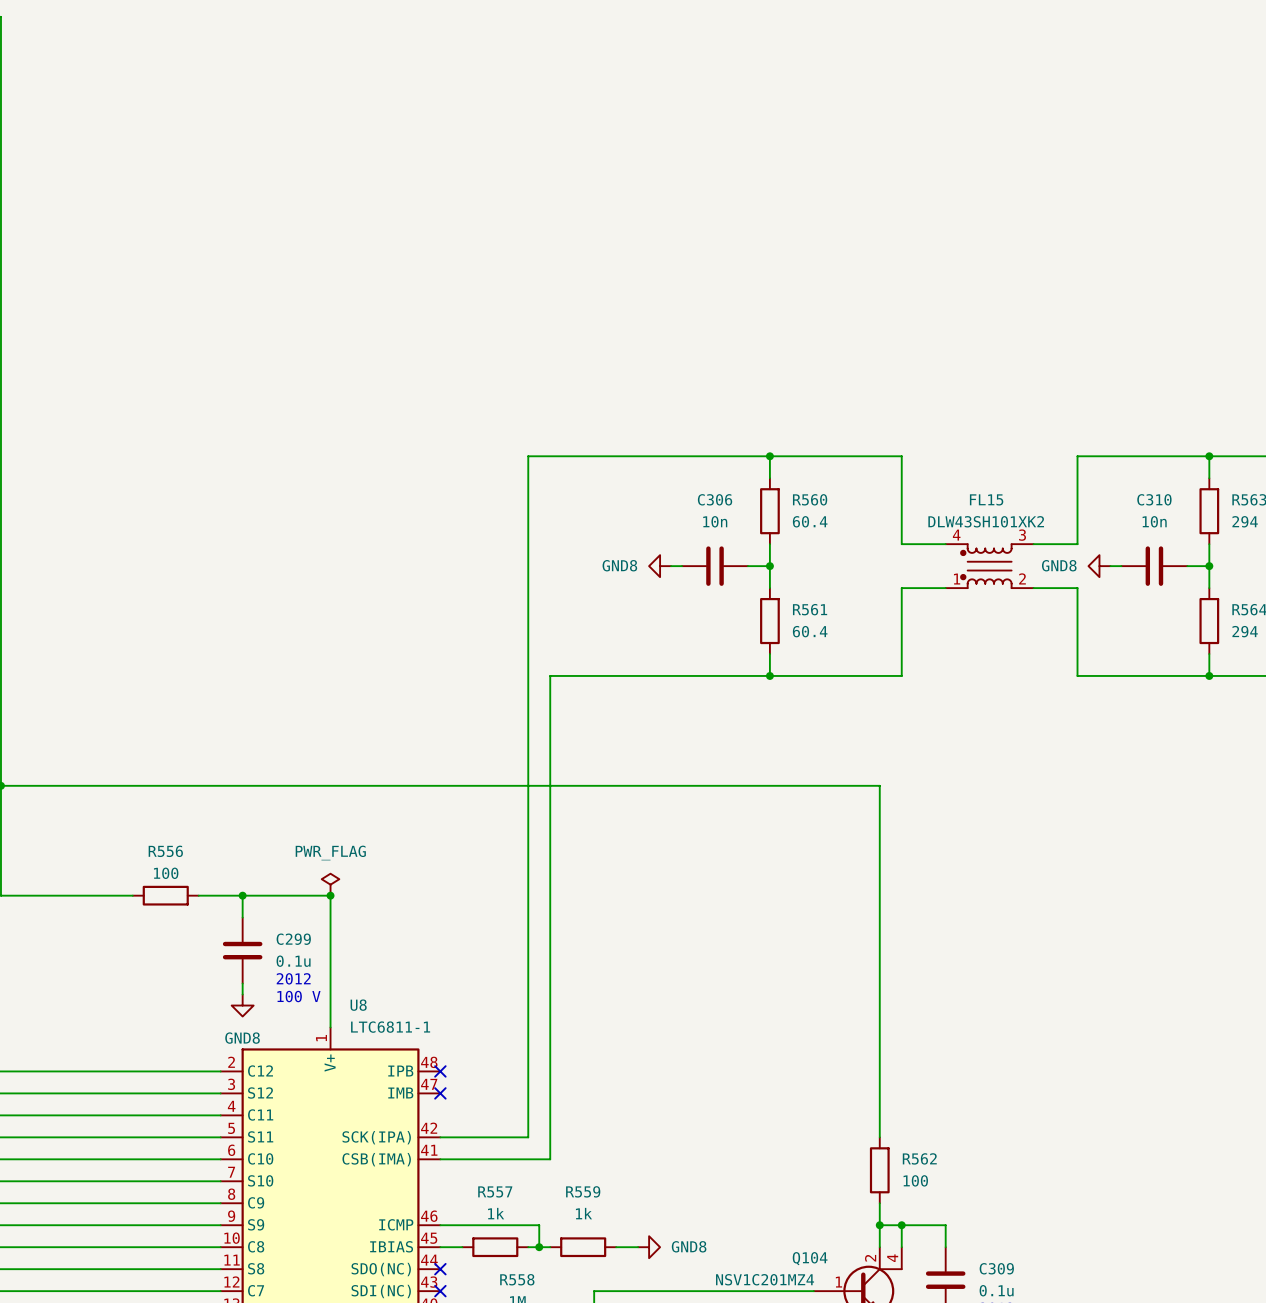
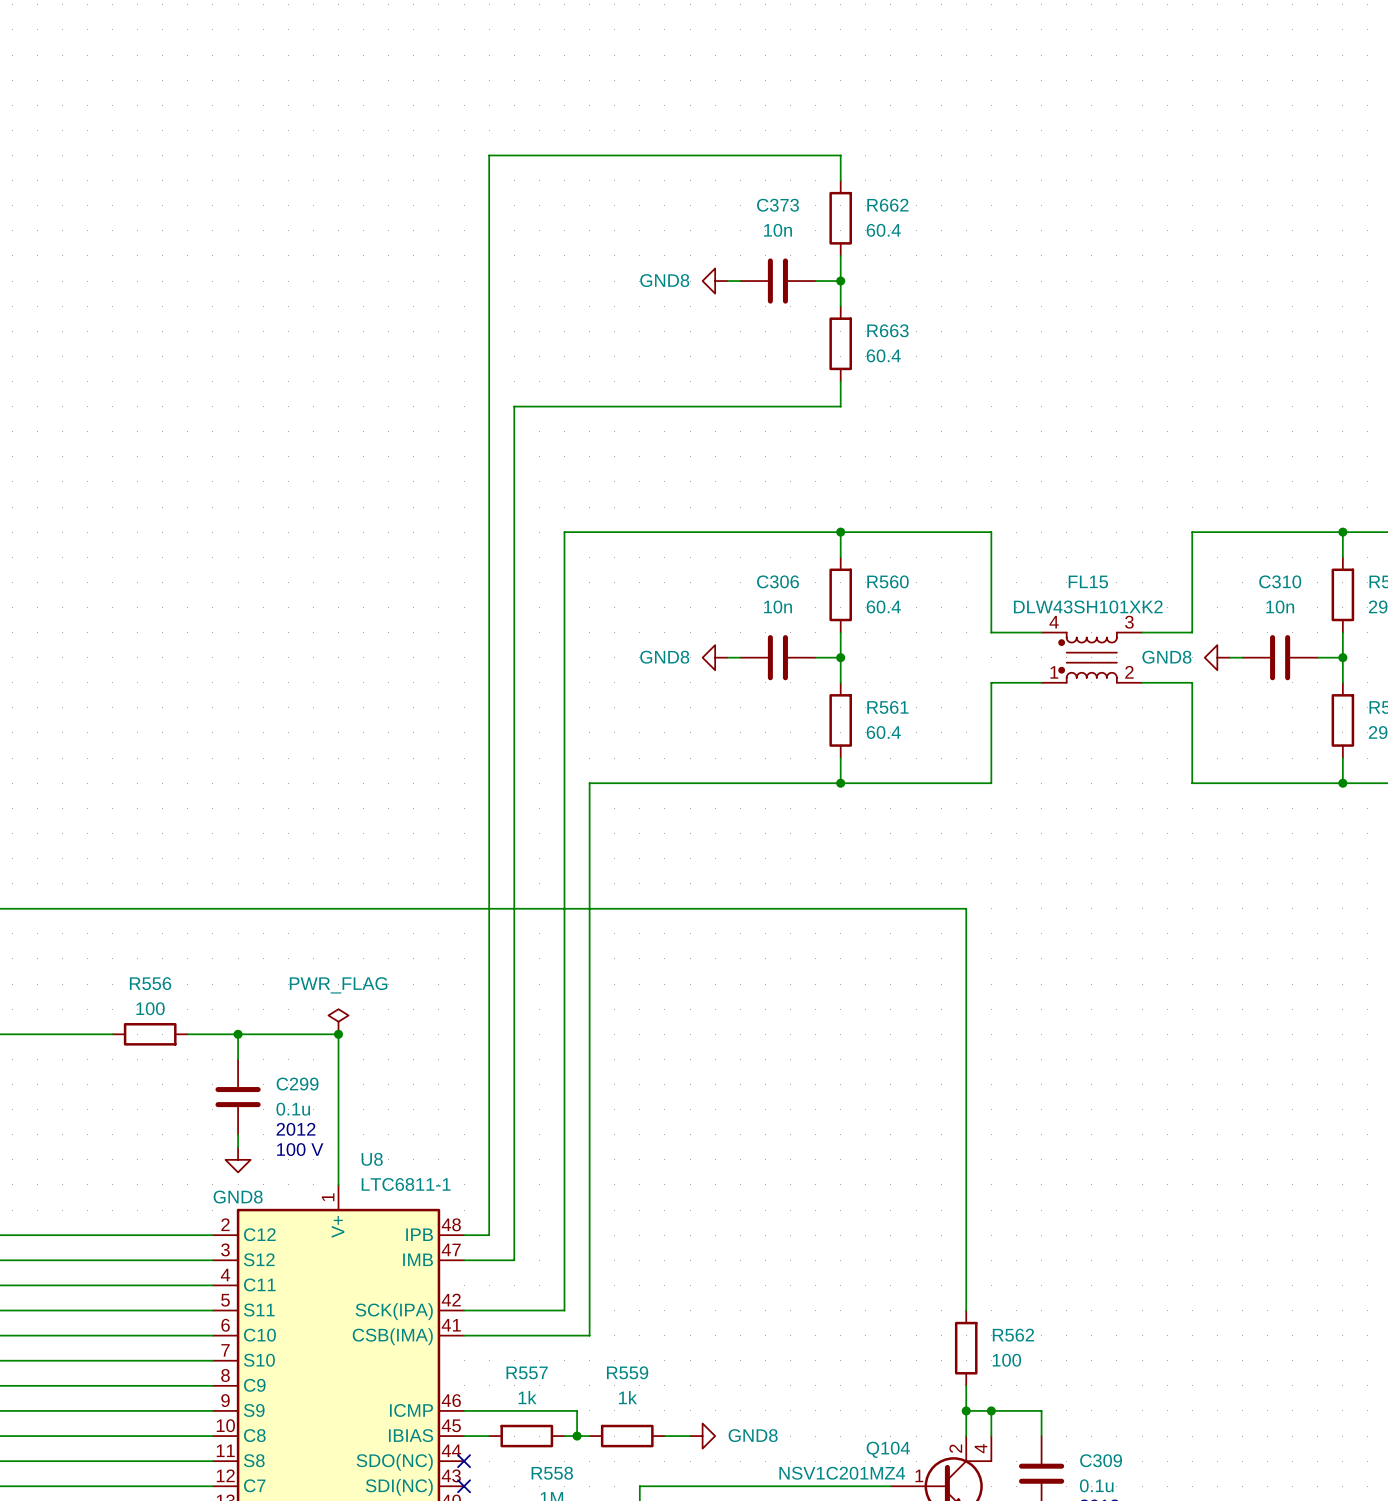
wire: none -> (840, 180) (840, 155) (489, 155) (489, 1235) (464, 1235)
R662: none -> 60.4 (840, 218)
wire: none -> (840, 255) (840, 306)
power symbol: none -> GND8 (715, 281)
wire: none -> (727, 281) (740, 281)
C373: none -> 10n (777, 281)
wire: none -> (815, 281) (840, 281)
junction: none -> (840, 281)
R663: none -> 60.4 (840, 343)
wire: none -> (840, 381) (840, 406) (514, 406) (514, 1260) (464, 1260)
no-connect mark: (440, 1071) -> none
no-connect mark: (440, 1093) -> none

